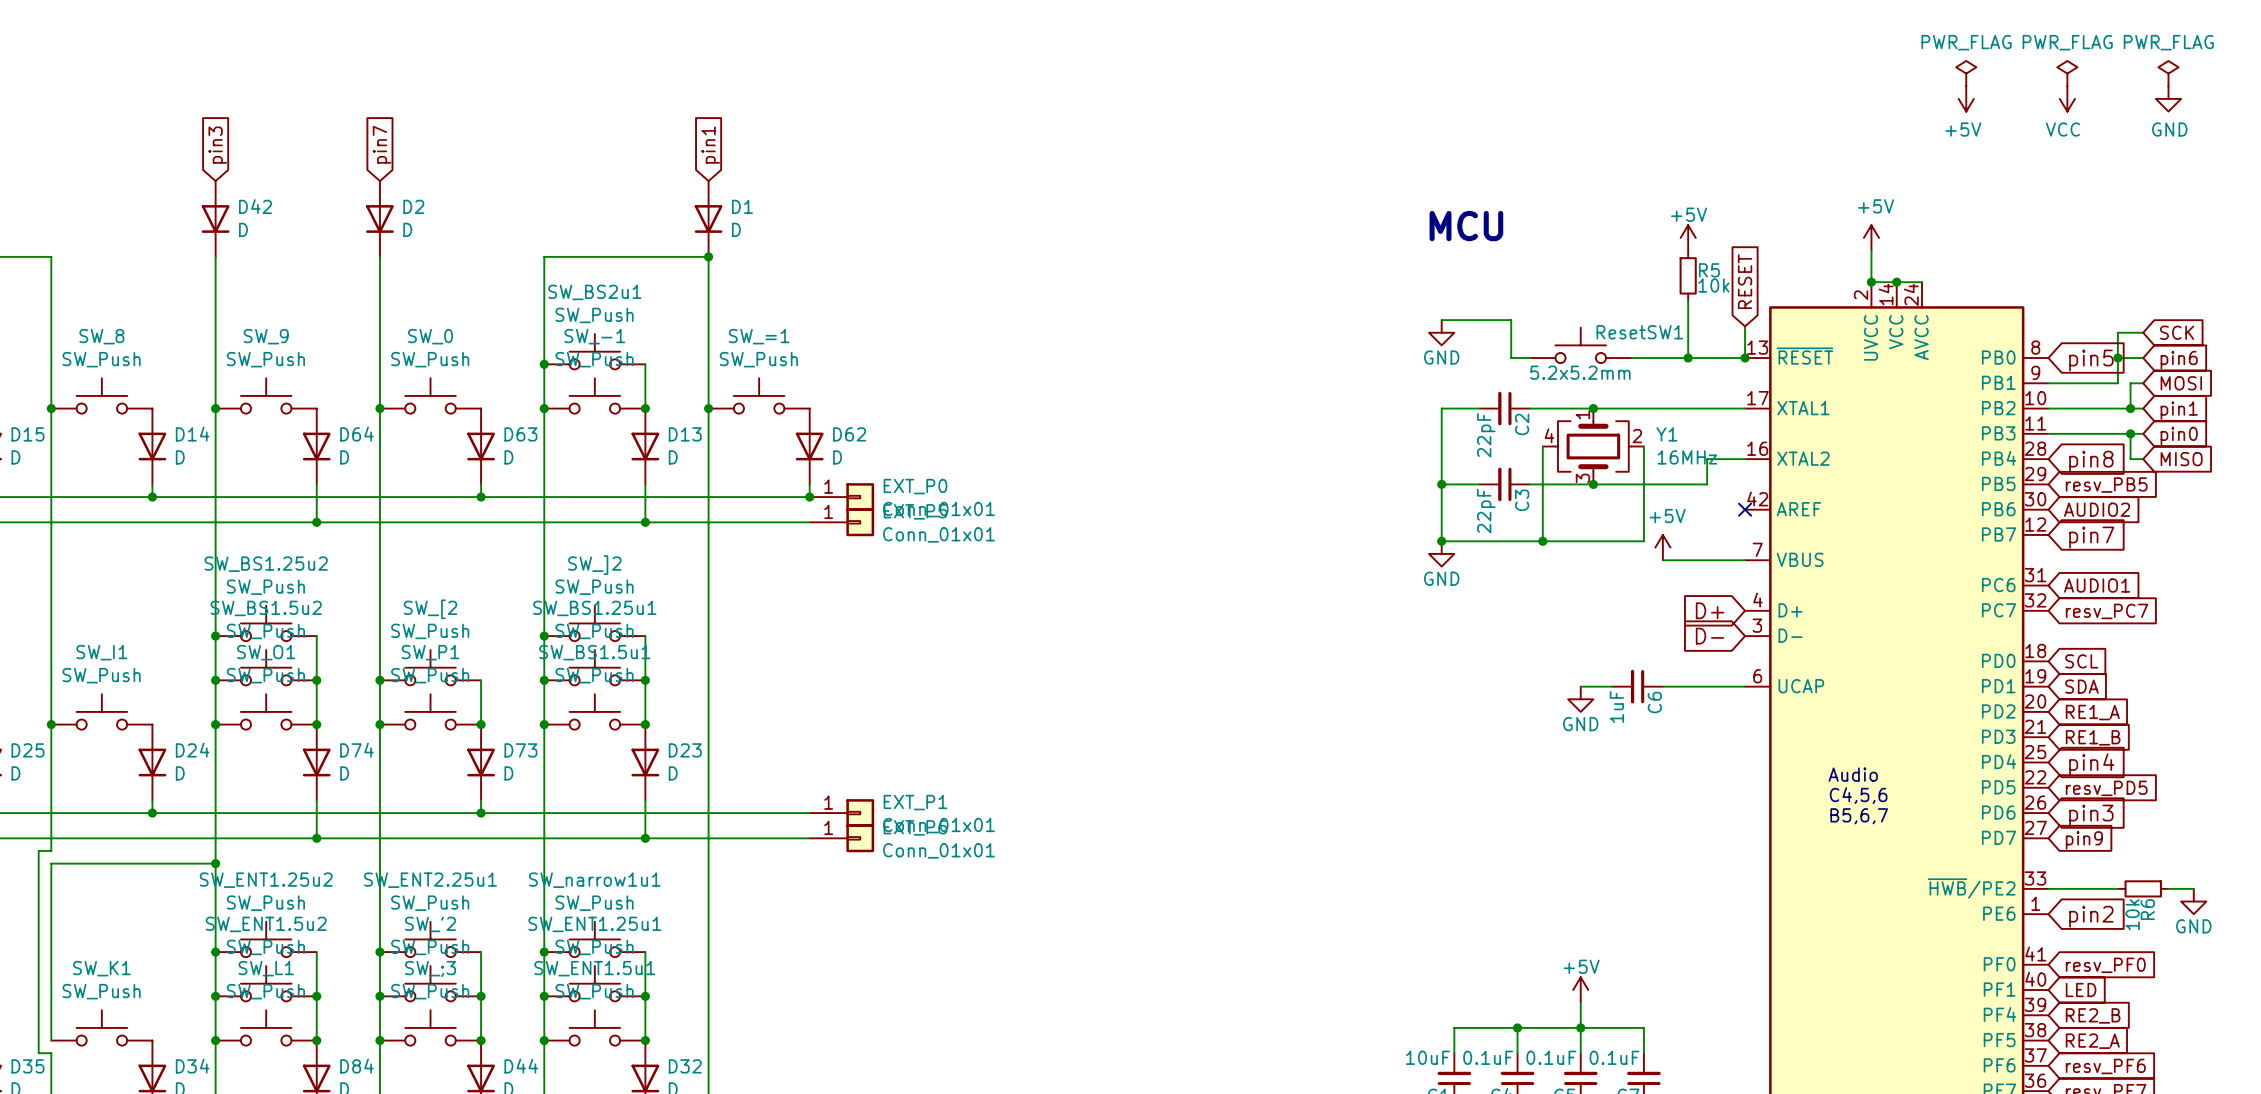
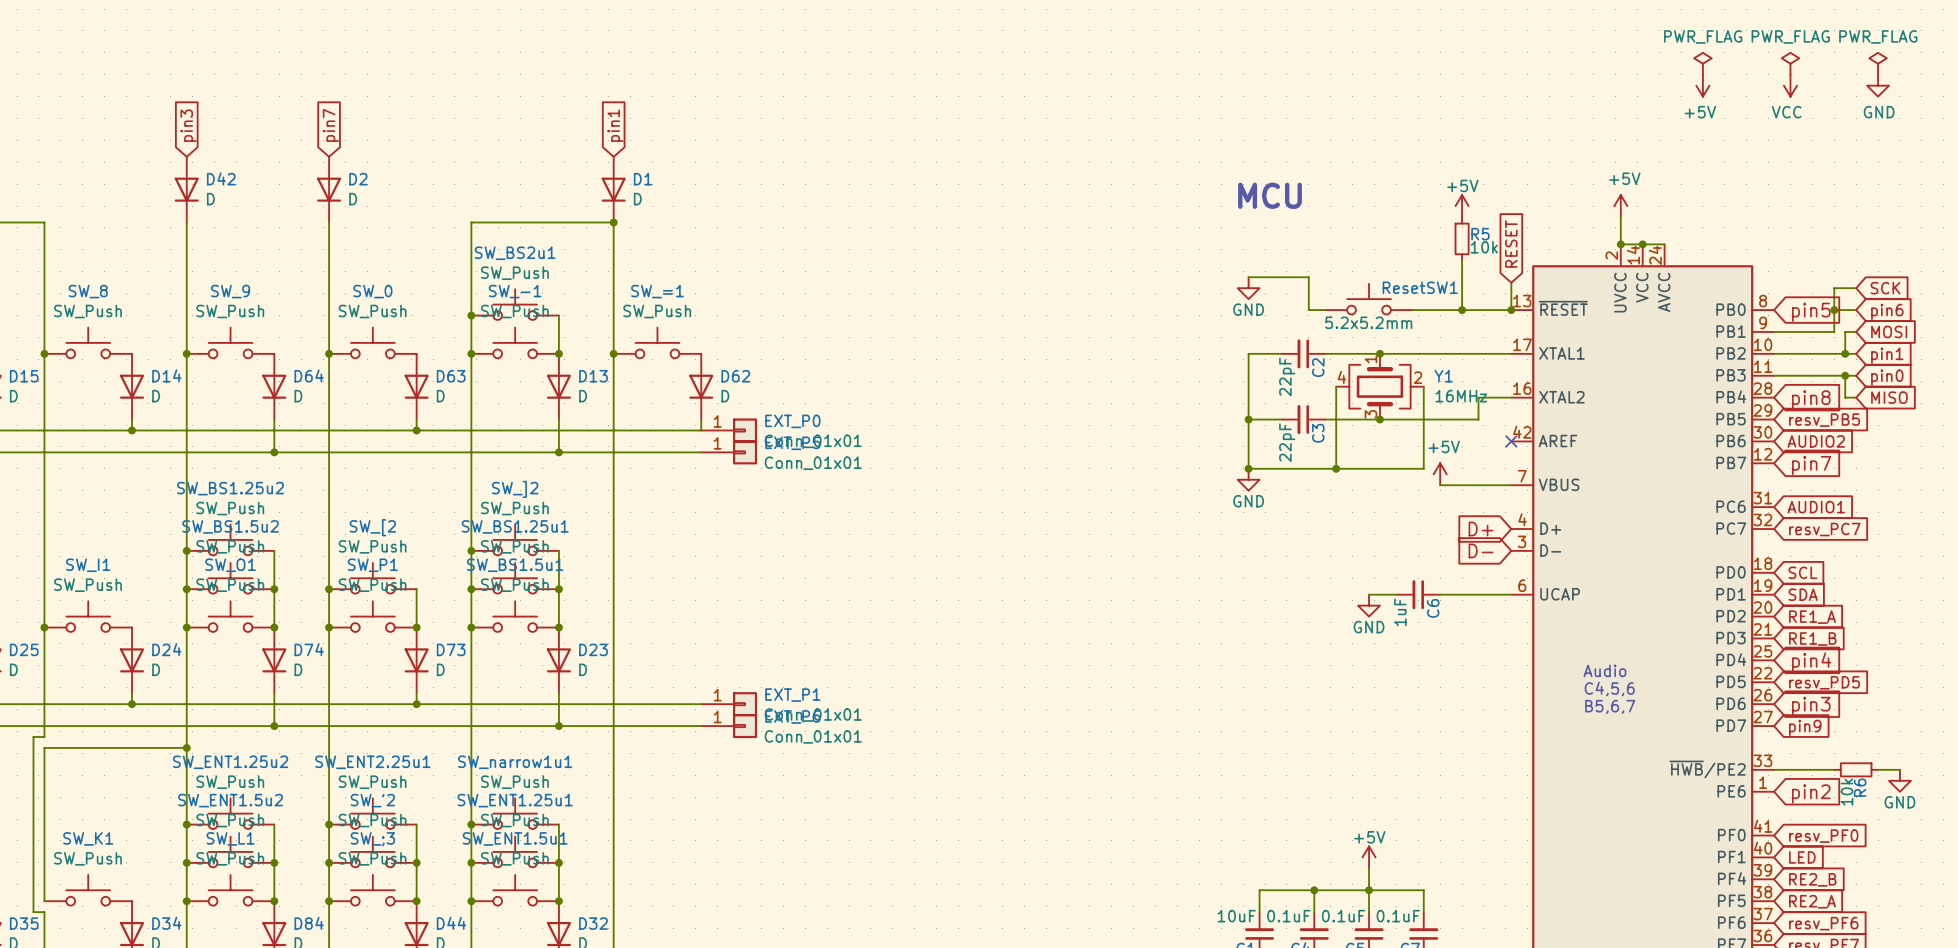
junction: (809, 497) -> none

